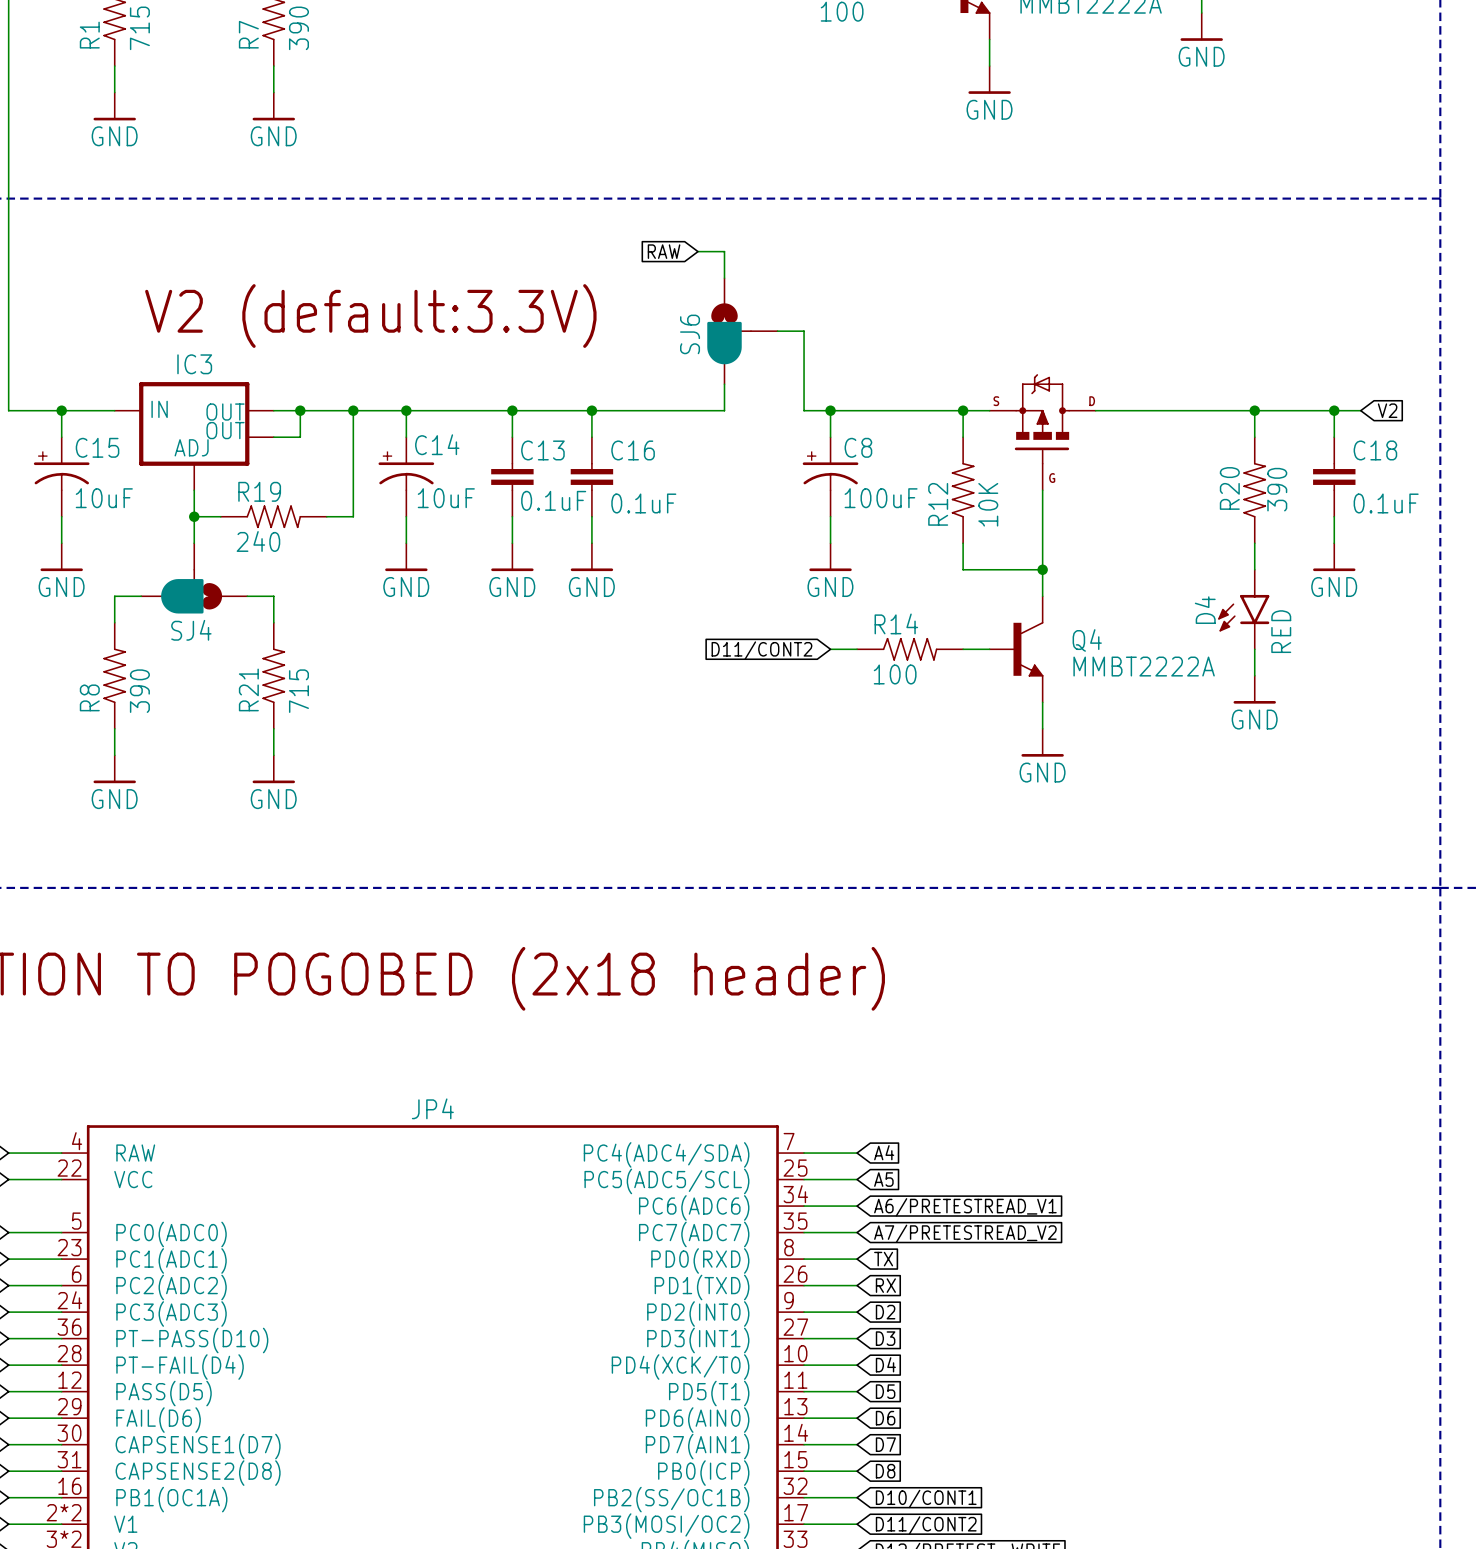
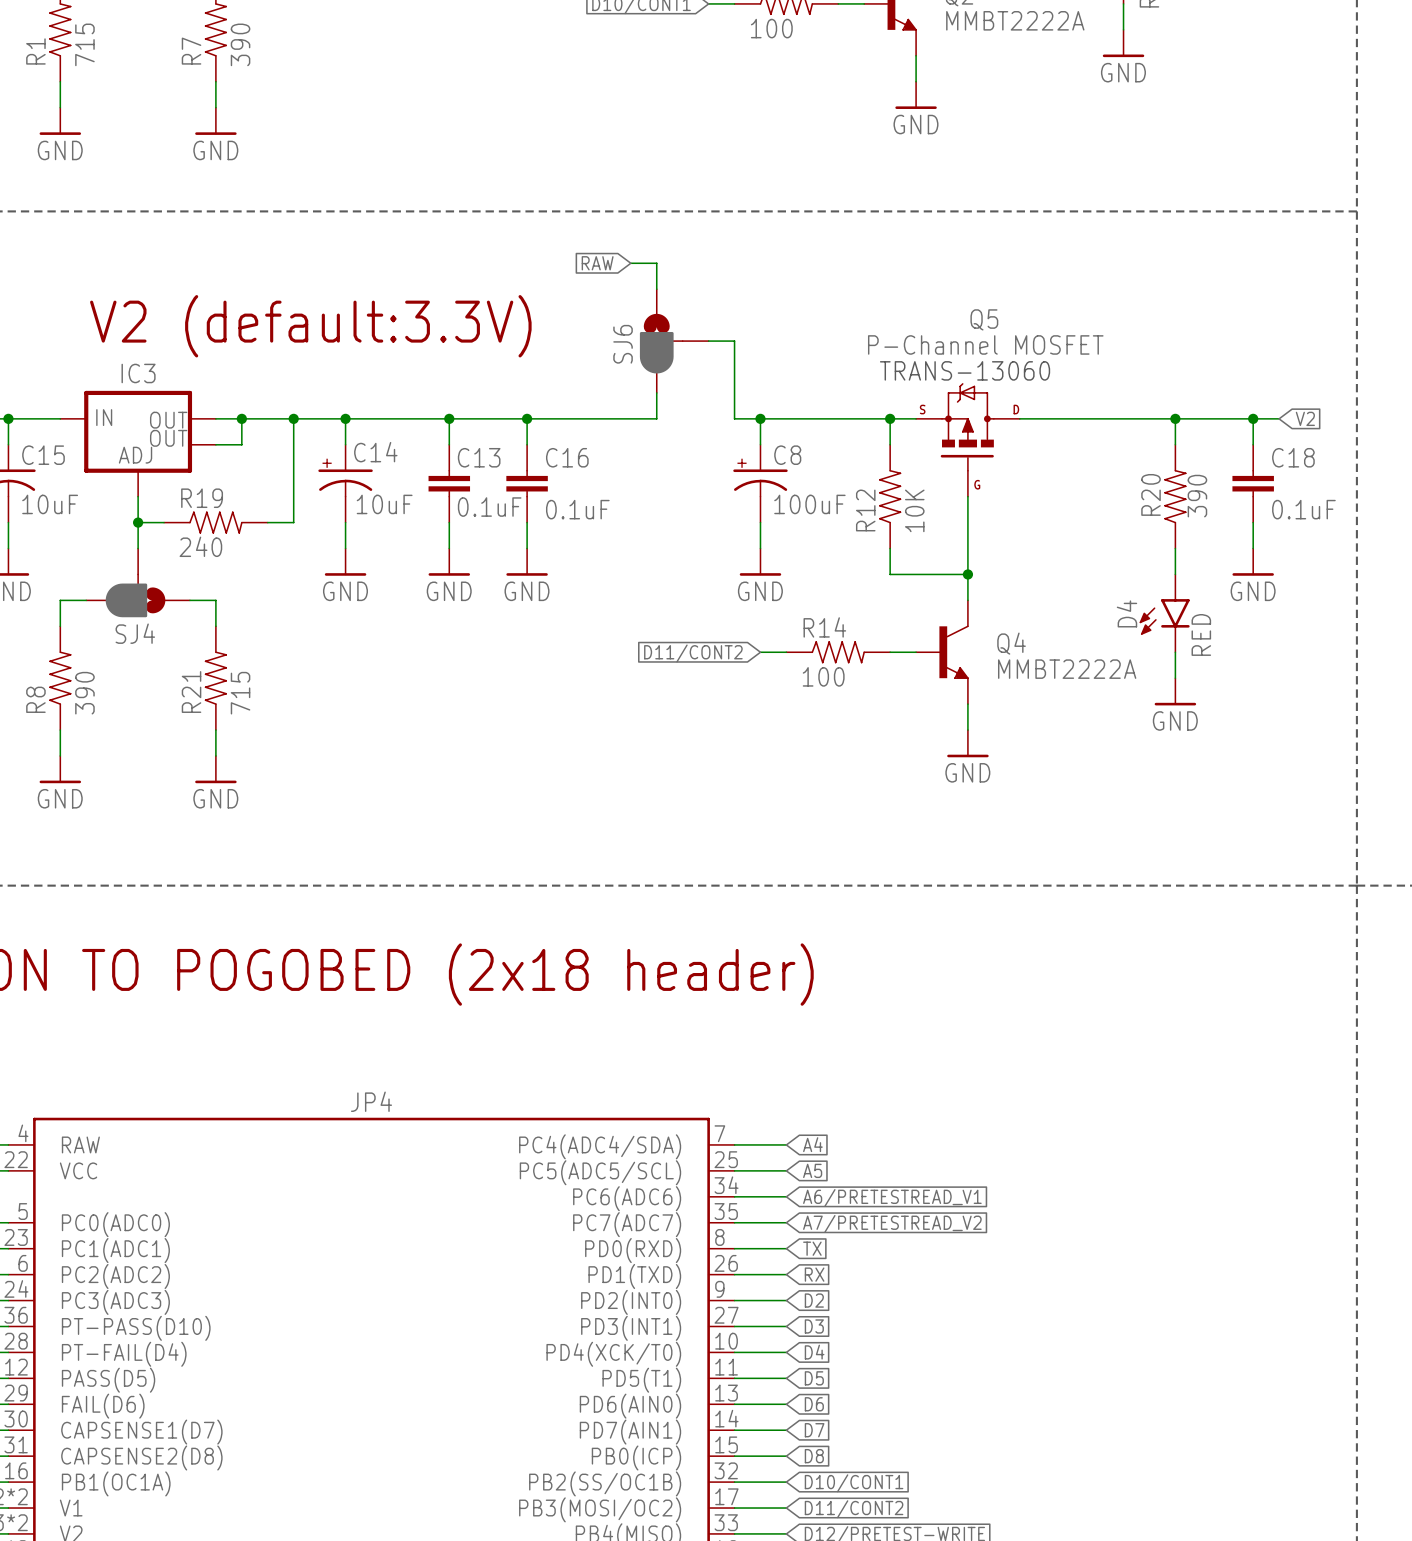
Q5 name: none -> Q5 (984, 319)
Q5 value: none -> P-Channel MOSFET (985, 344)
text: none -> TRANS-13060 (965, 370)

